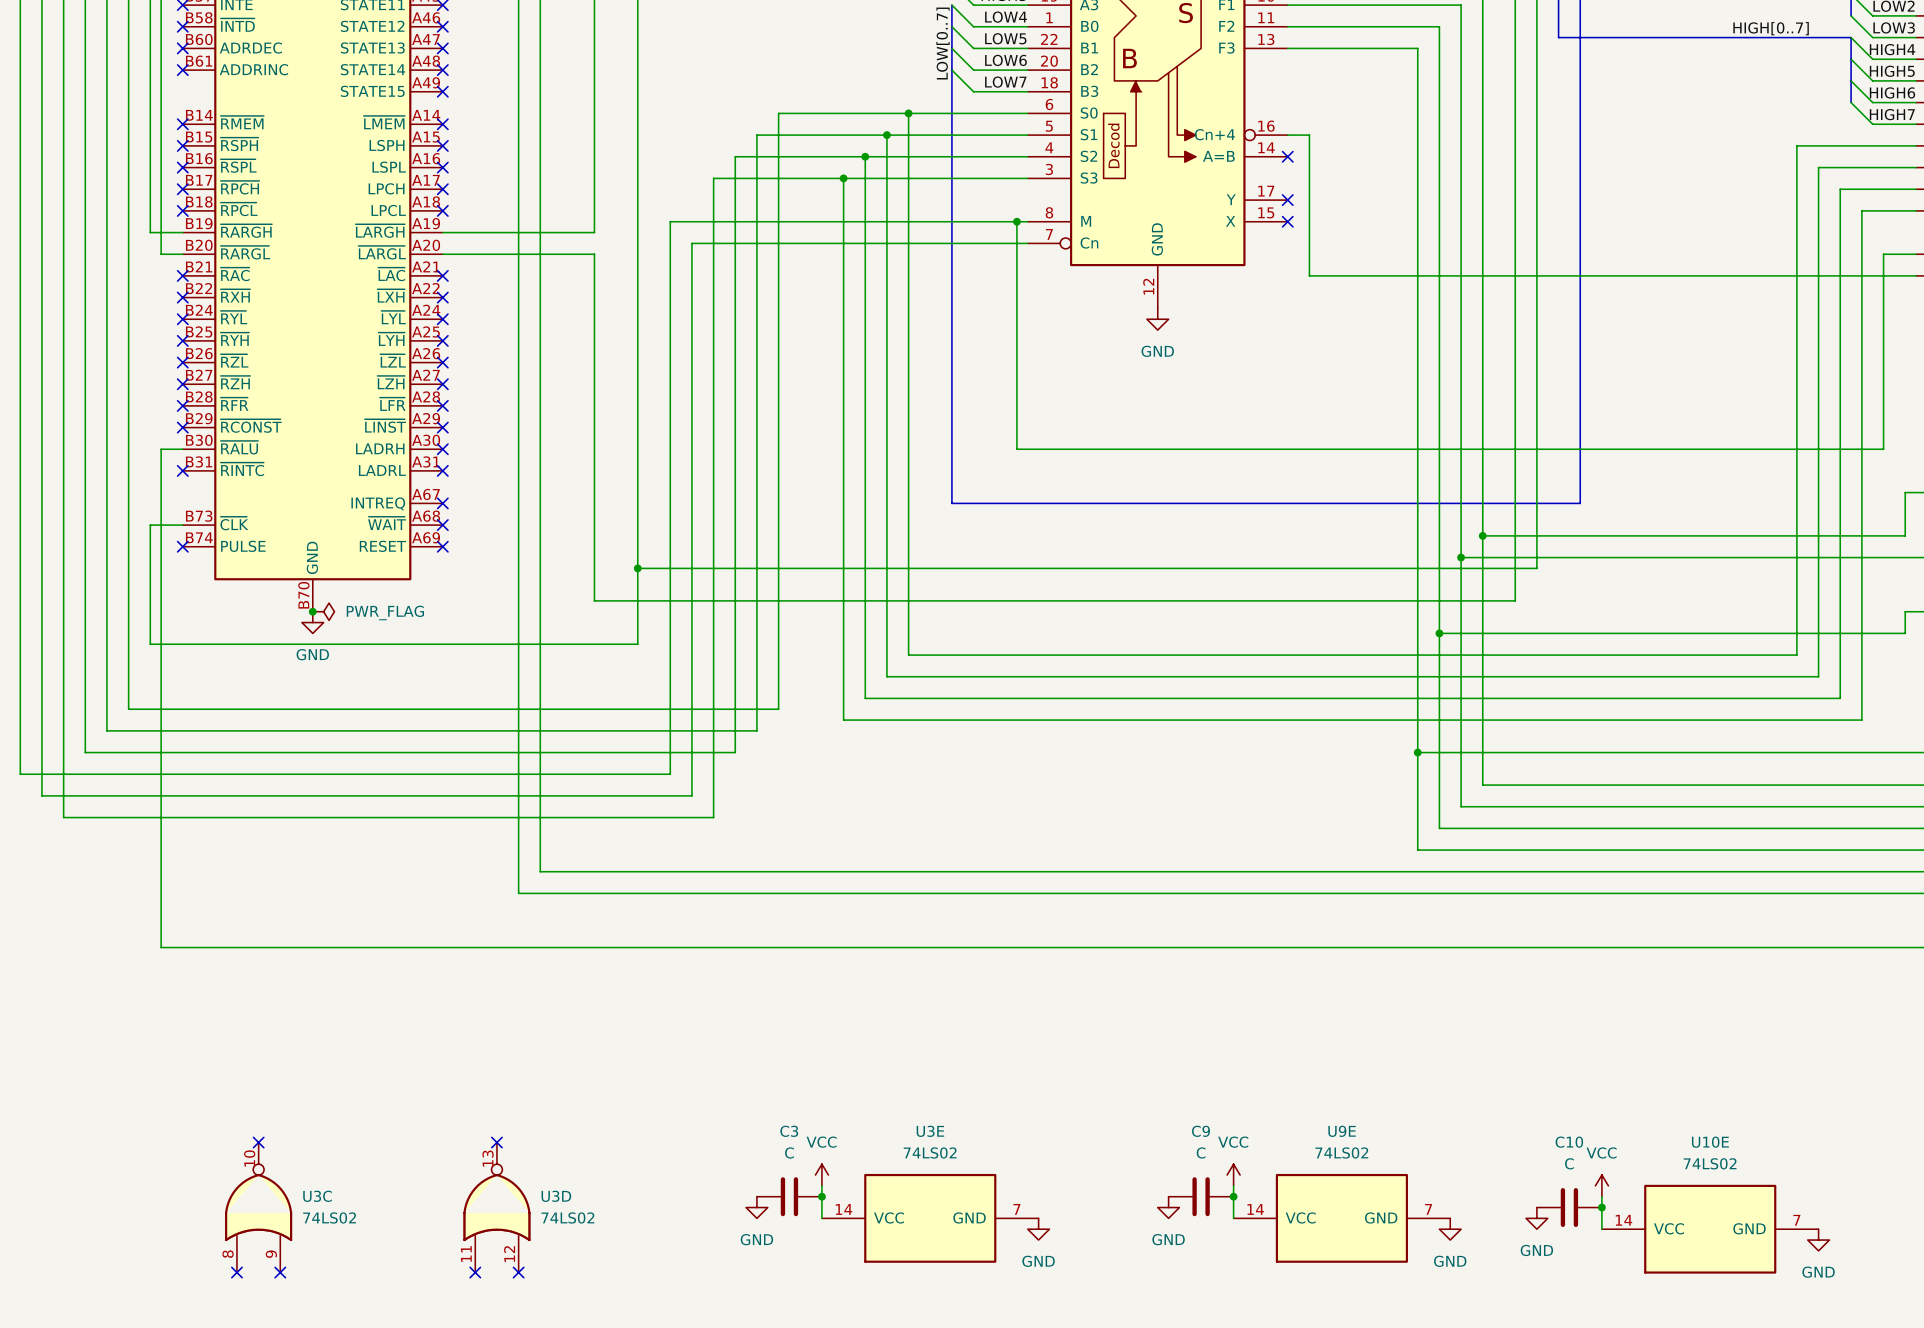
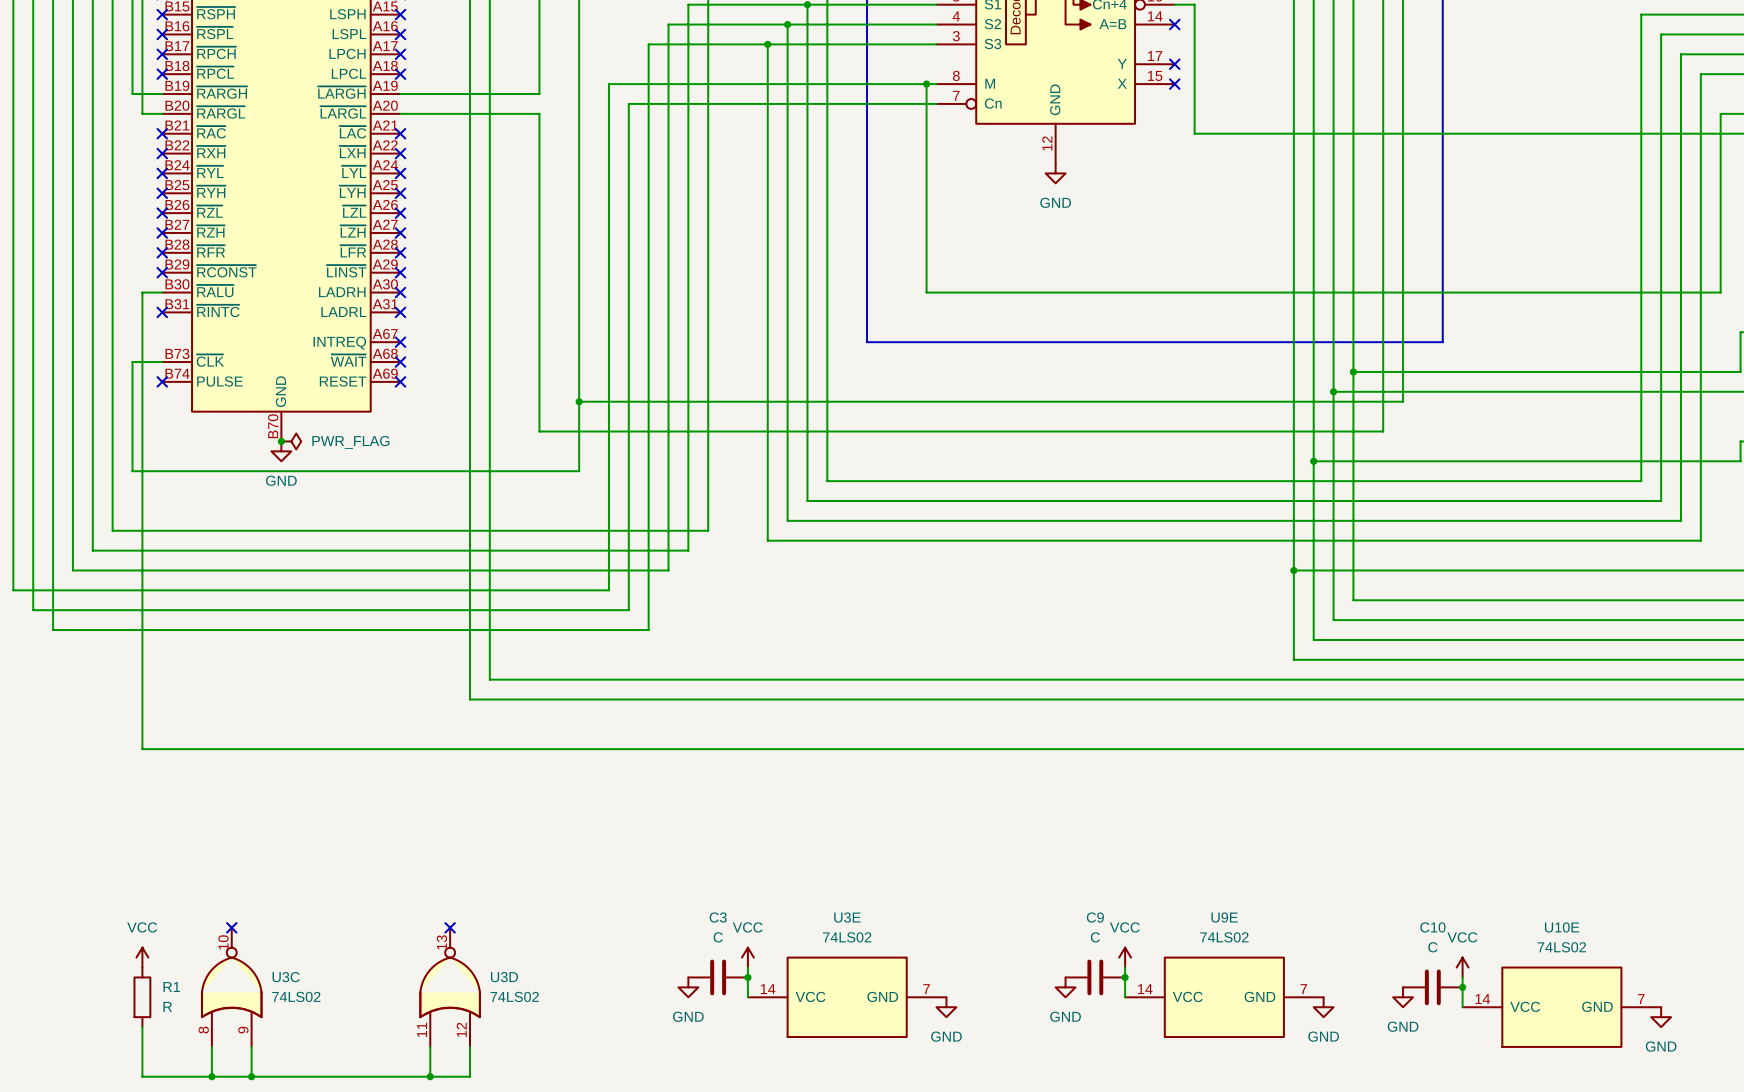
power symbol: none -> VCC (142, 957)
R1: none -> R (142, 997)
wire: none -> (142, 1027) (142, 1076) (469, 1076) (469, 1046)
wire: none -> (211, 1046) (211, 1076)
no-connect mark: (236, 1272) -> none
wire: none -> (251, 1046) (251, 1076)
no-connect mark: (280, 1272) -> none
wire: none -> (430, 1046) (430, 1076)
no-connect mark: (475, 1272) -> none
no-connect mark: (518, 1272) -> none
junction: none -> (211, 1076)
junction: none -> (251, 1076)
junction: none -> (430, 1076)

